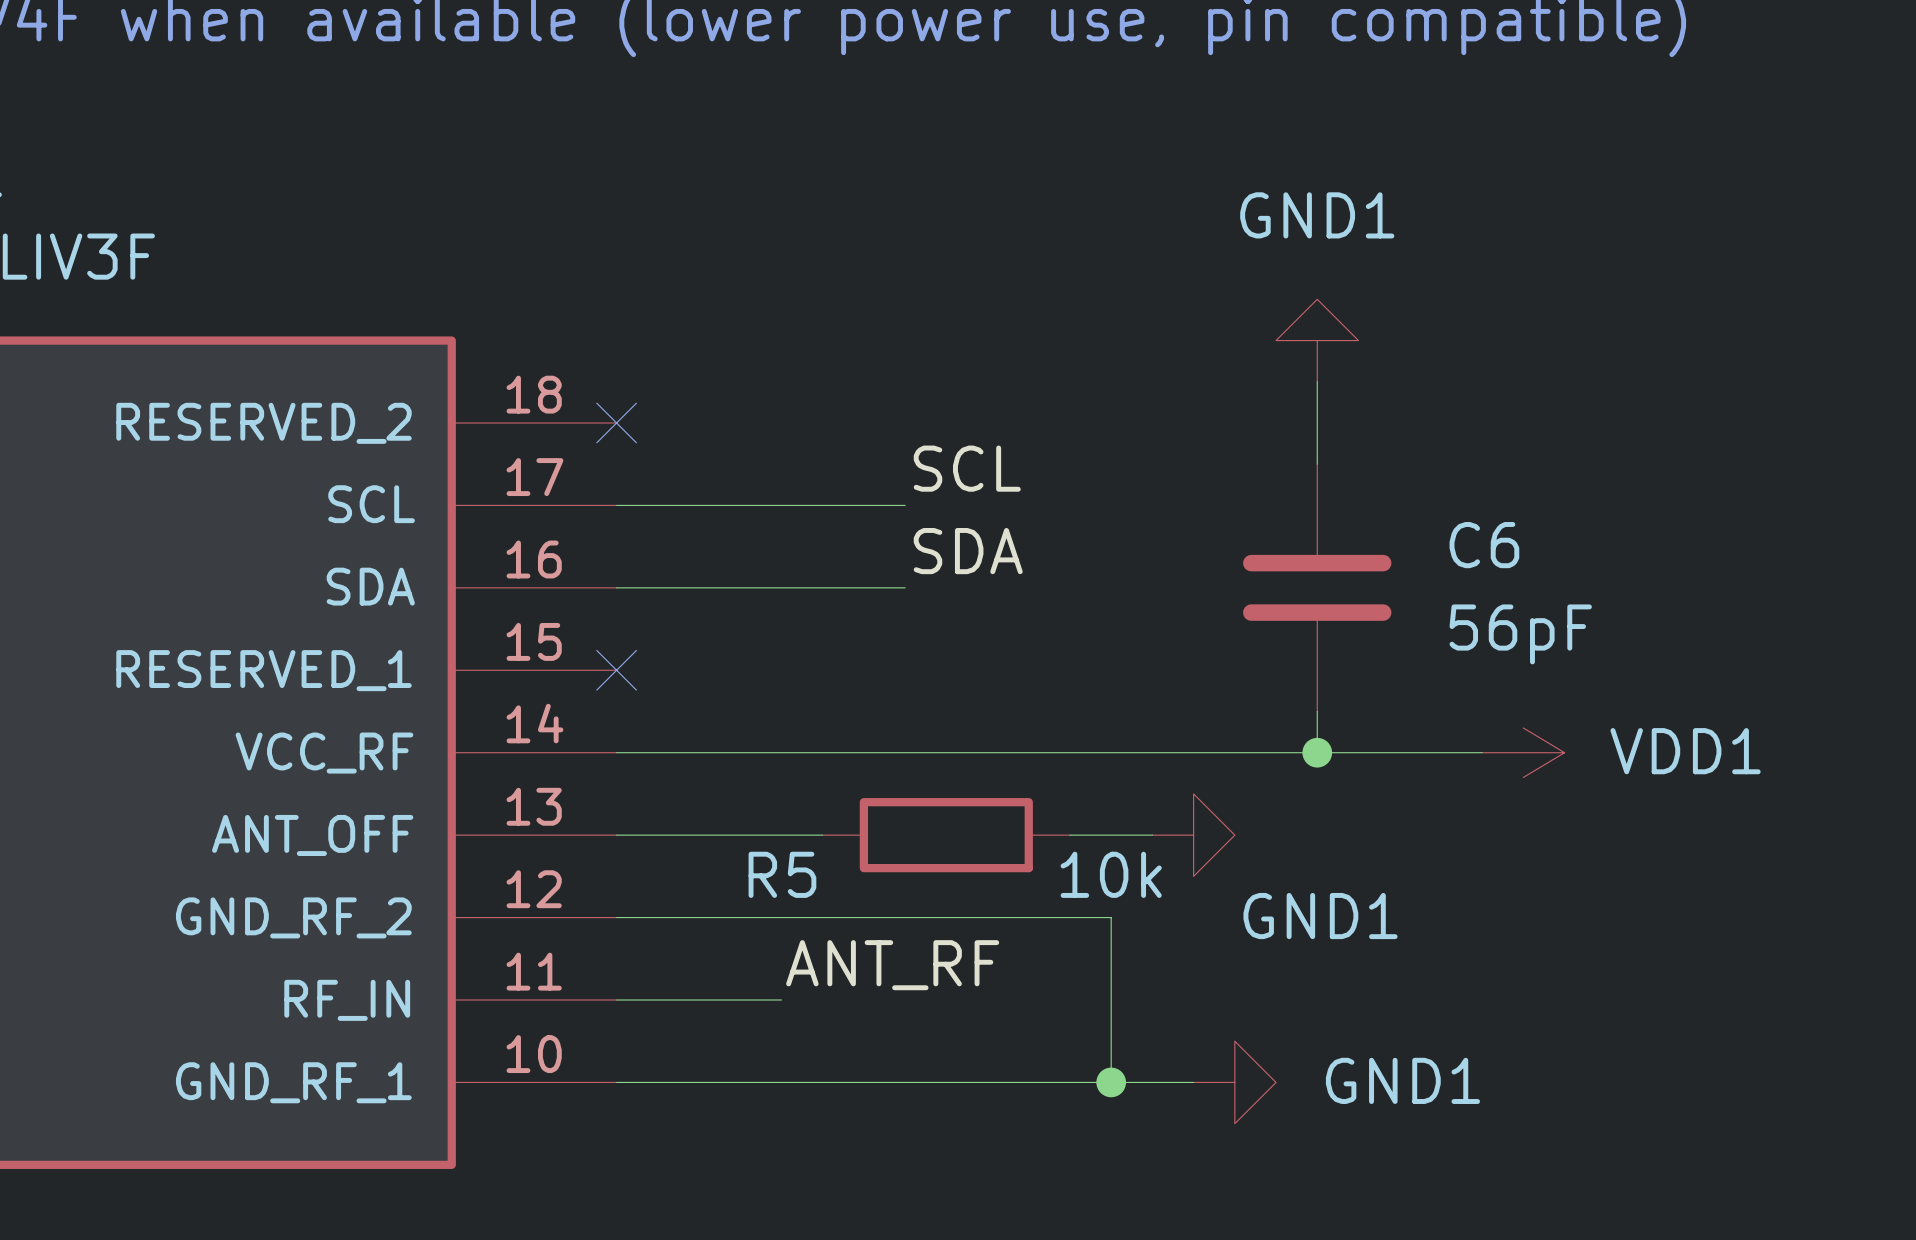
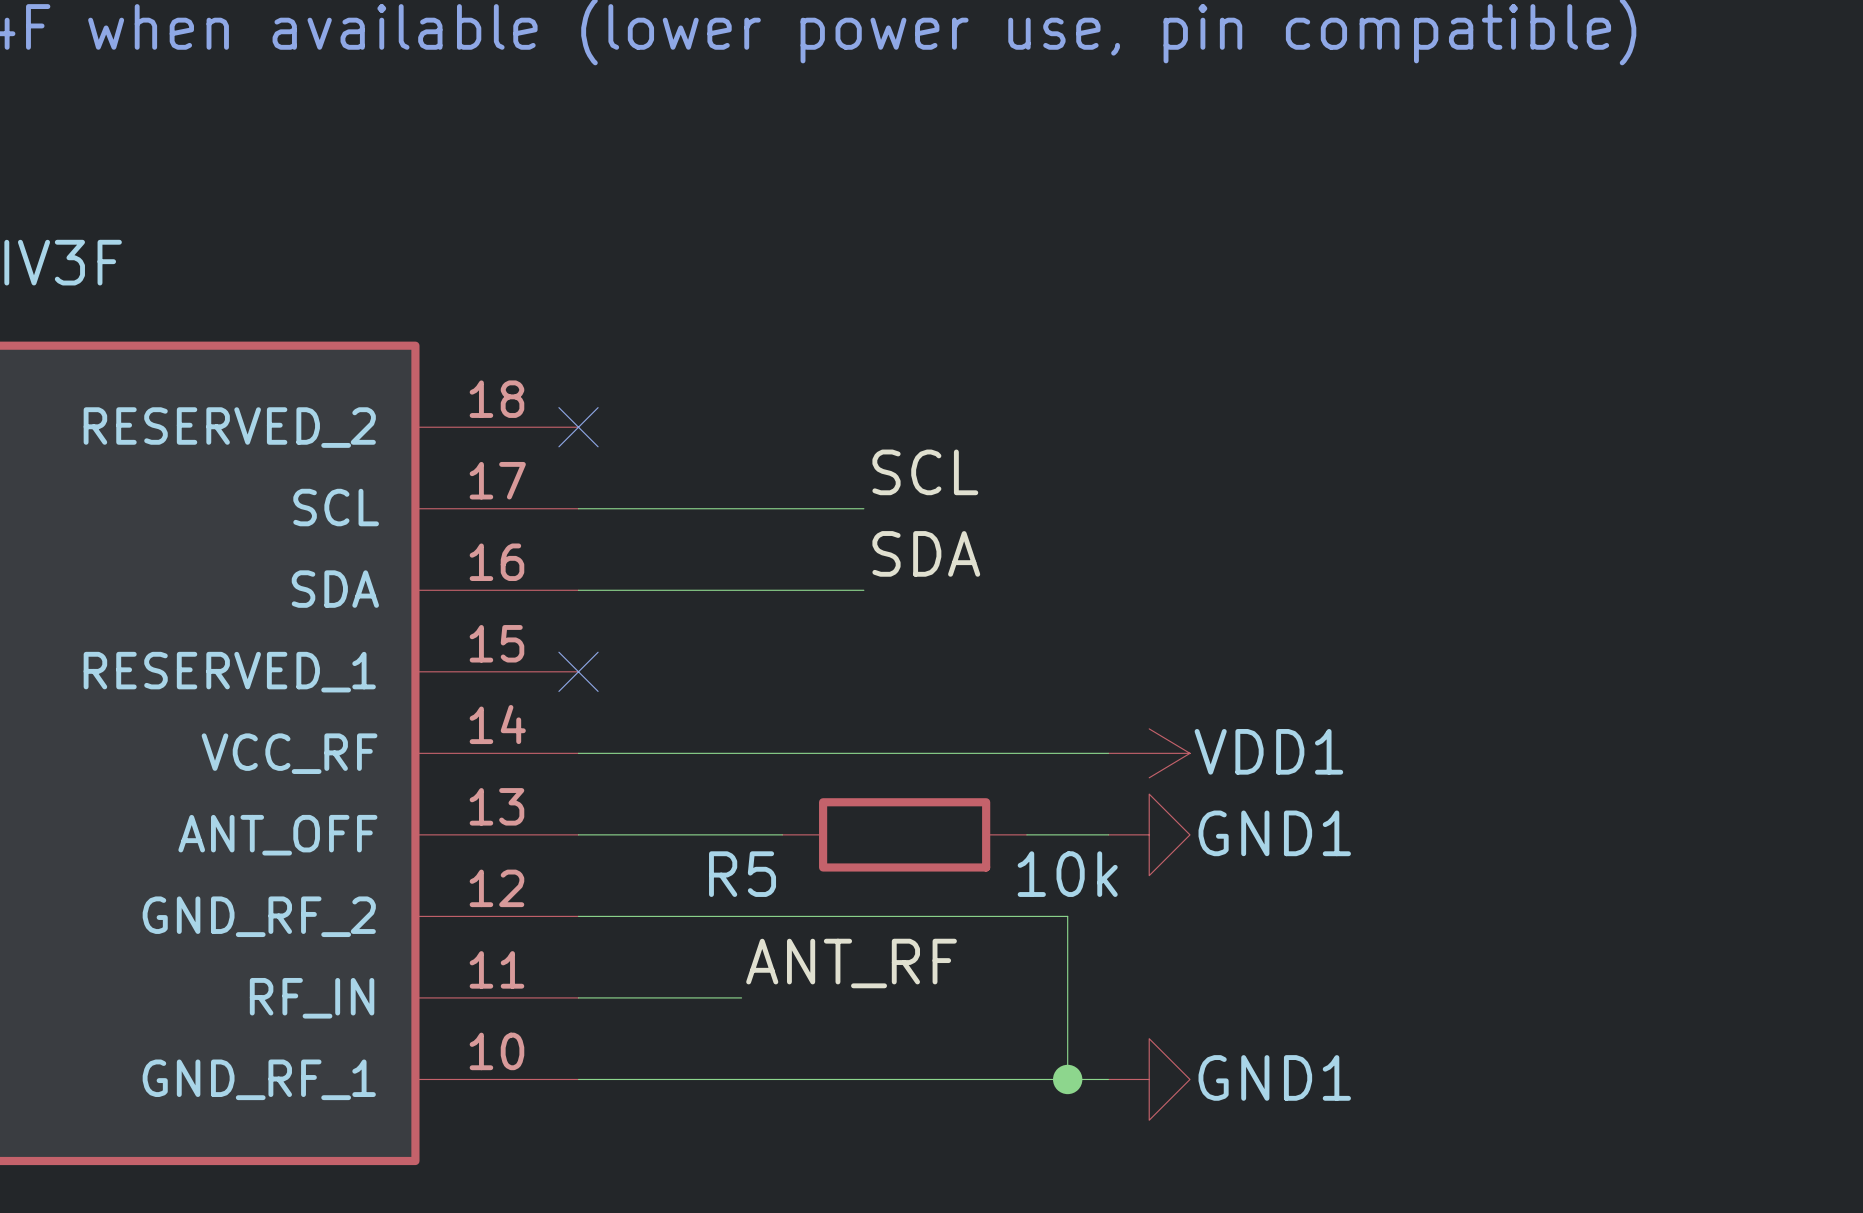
power symbol: GND1 (1317, 340) -> none
wire: (1317, 381) (1317, 464) -> none
C6: 56pF (1317, 587) -> none
wire: (1317, 711) (1317, 752) -> none
power symbol text position: VDD1 (1685, 751) -> VDD1 (1268, 751)
wire: (1152, 752) (1482, 752) -> none
junction: (1317, 752) -> none
power symbol position: VDD1 (1523, 752) -> VDD1 (1149, 753)
power symbol text position: GND1 (1320, 916) -> GND1 (1274, 833)
power symbol text position: GND1 (1402, 1080) -> GND1 (1274, 1077)
power symbol position: GND1 (1234, 1082) -> GND1 (1149, 1079)

